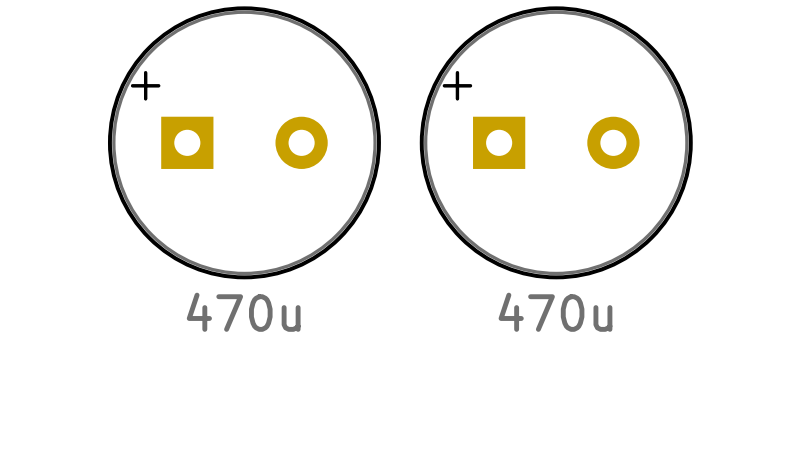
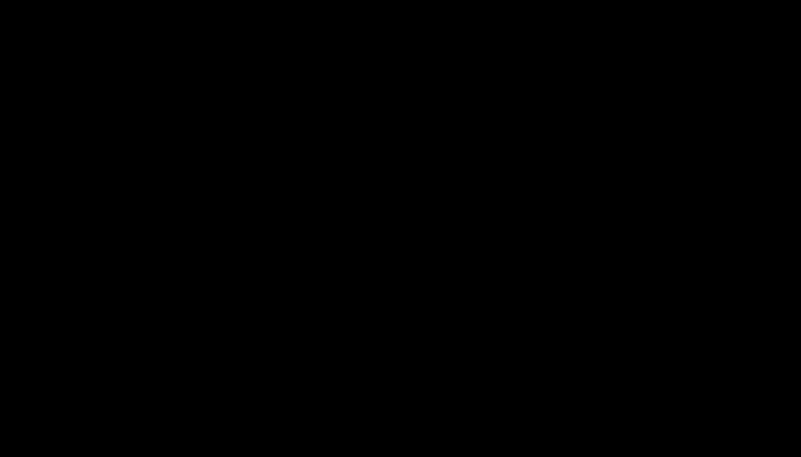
part: 470u (244, 142) -> none
part: 470u (556, 142) -> none

